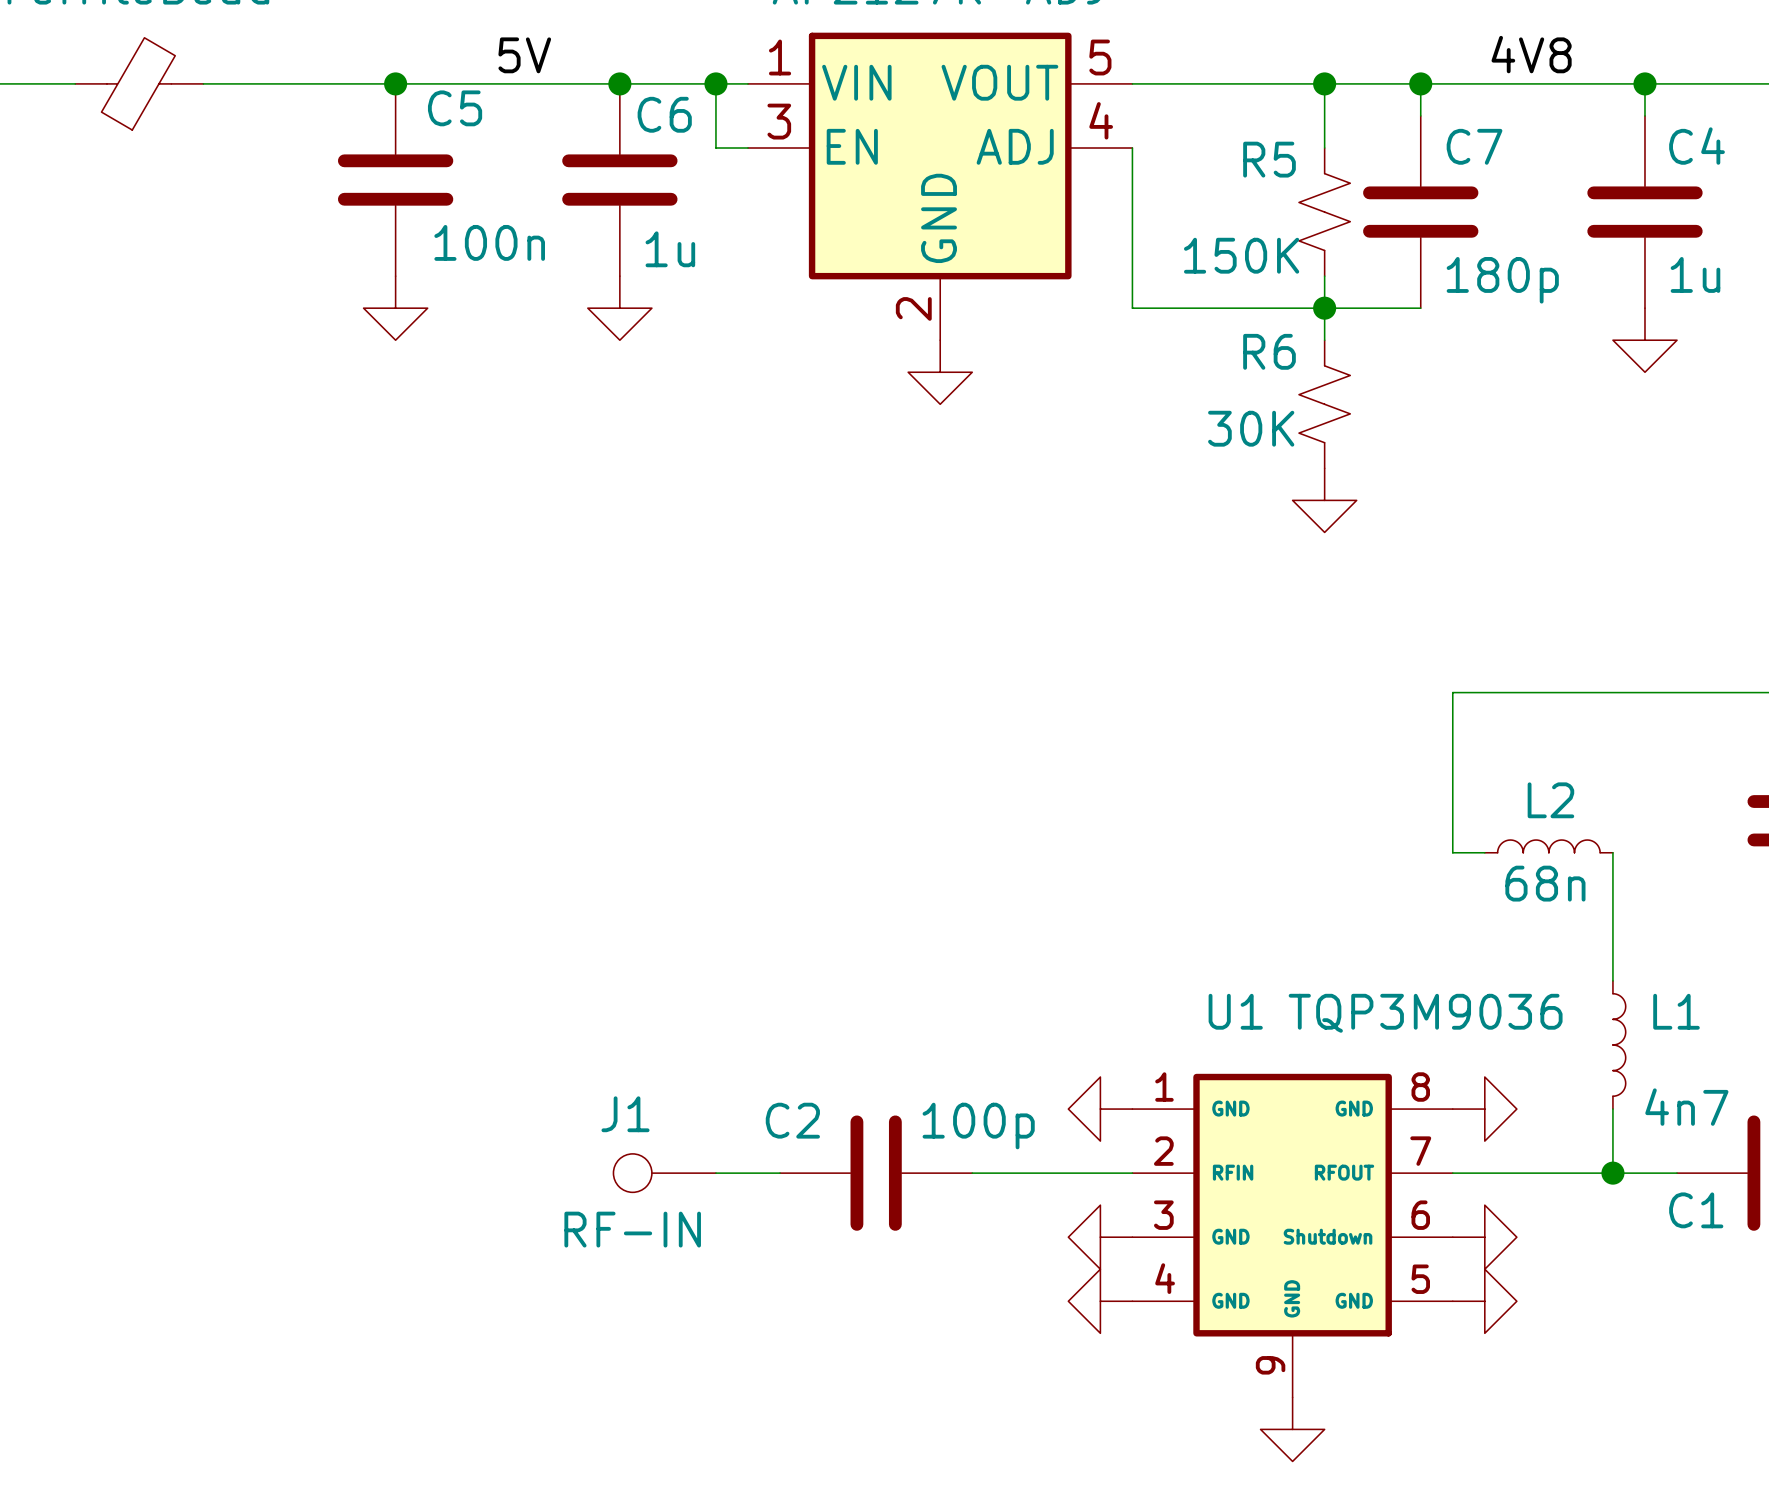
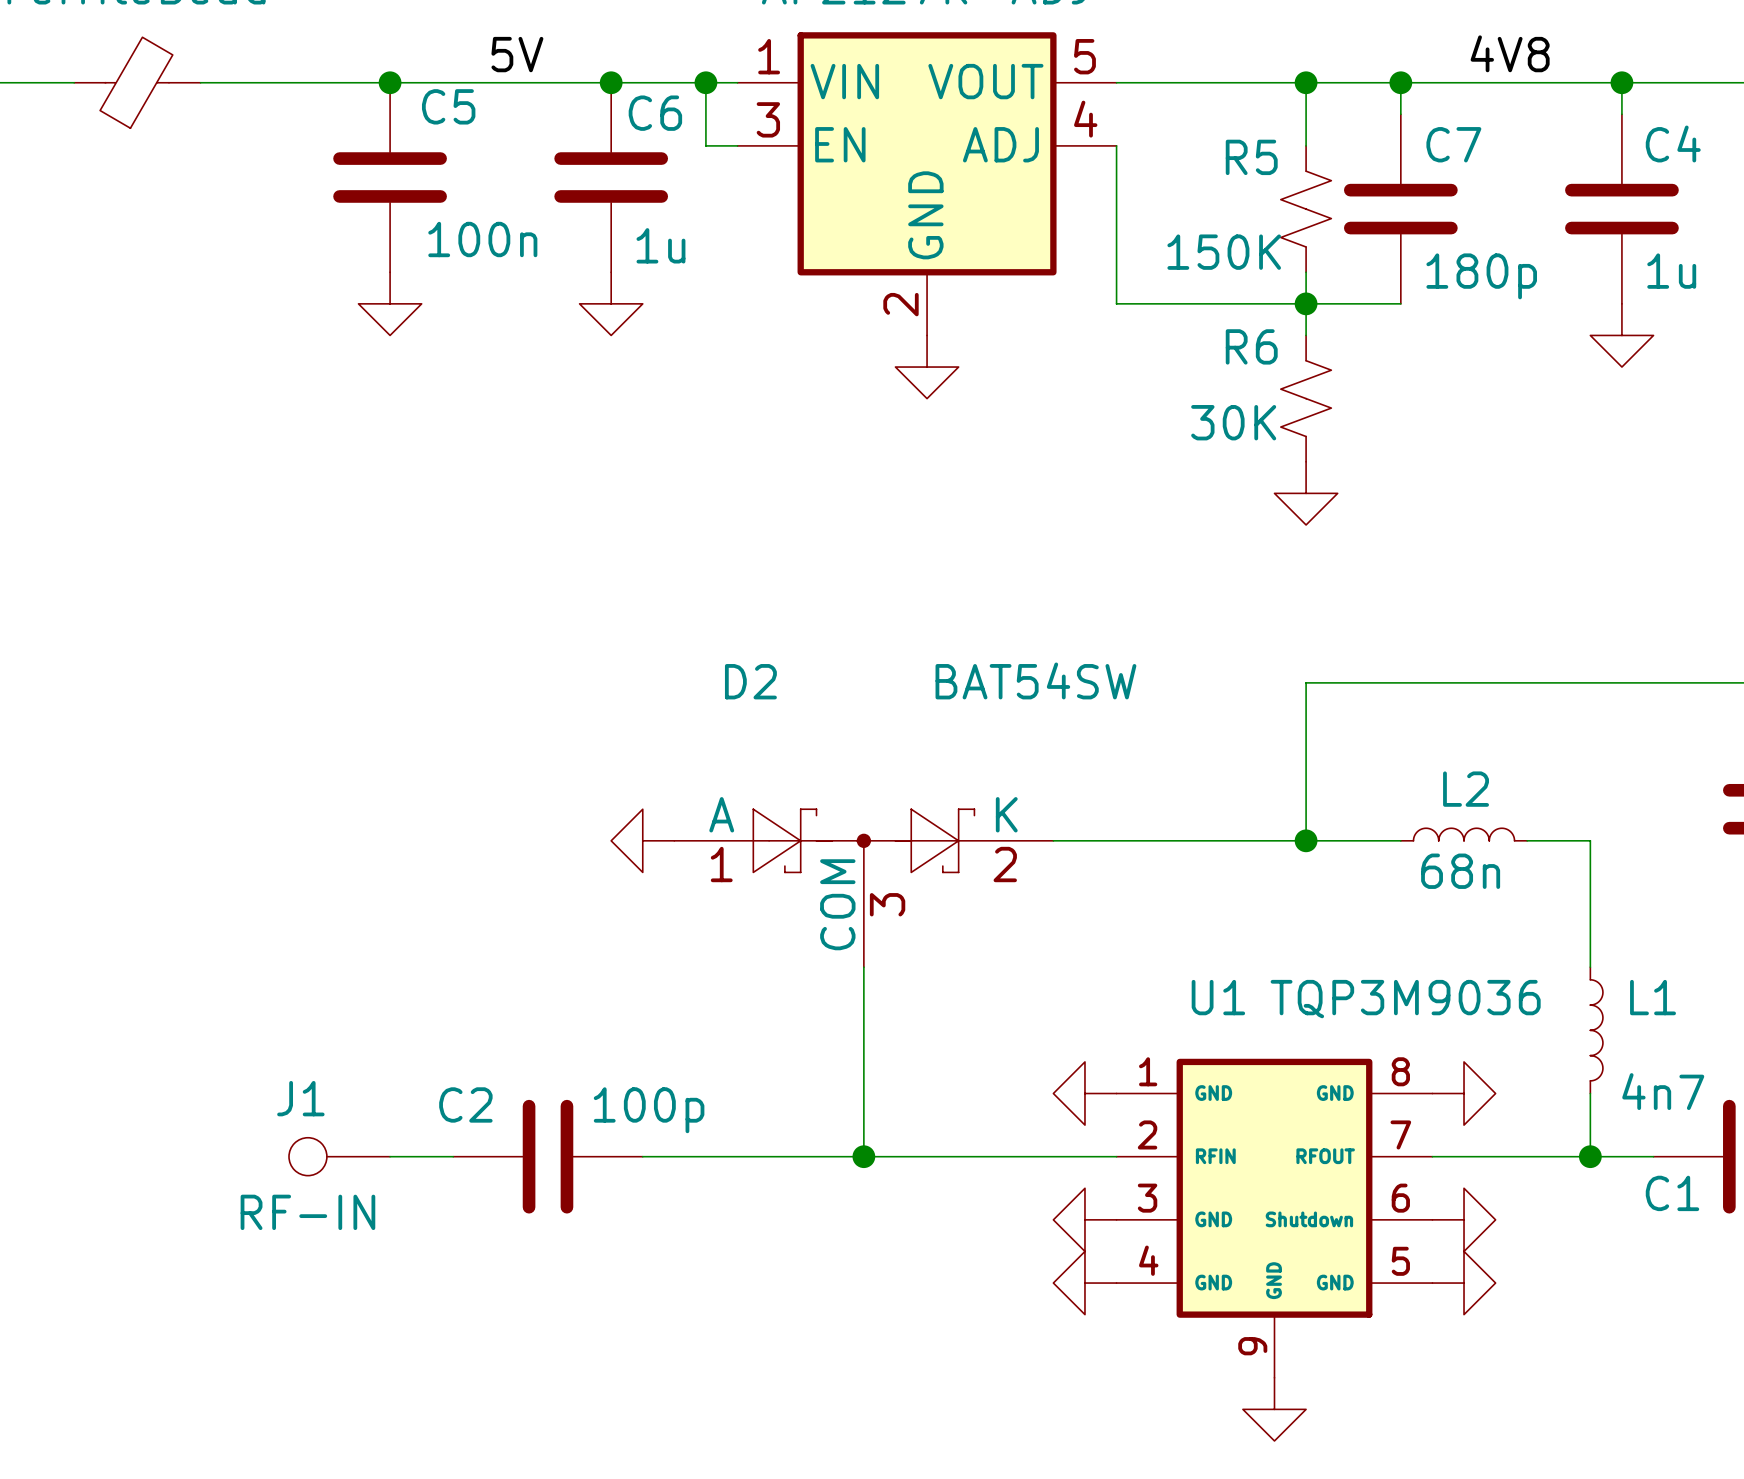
wire: (1452, 692) (1452, 852) (1484, 852) -> (1432, 682) (1306, 682) (1306, 840)
L2 position: (1548, 846) -> (1464, 834)
power symbol: none -> (642, 840)
wire: none -> (1053, 840) (1400, 840)
junction: none -> (1306, 840)
wire: none -> (1527, 840) (1590, 840)
D2: none -> BAT54SW (863, 888)
wire: none -> (863, 967) (863, 1156)
wire: none -> (390, 1156) (453, 1156)
J1 position: (664, 1173) -> (339, 1156)
C2 position: (876, 1173) -> (548, 1156)
junction: none -> (863, 1156)

